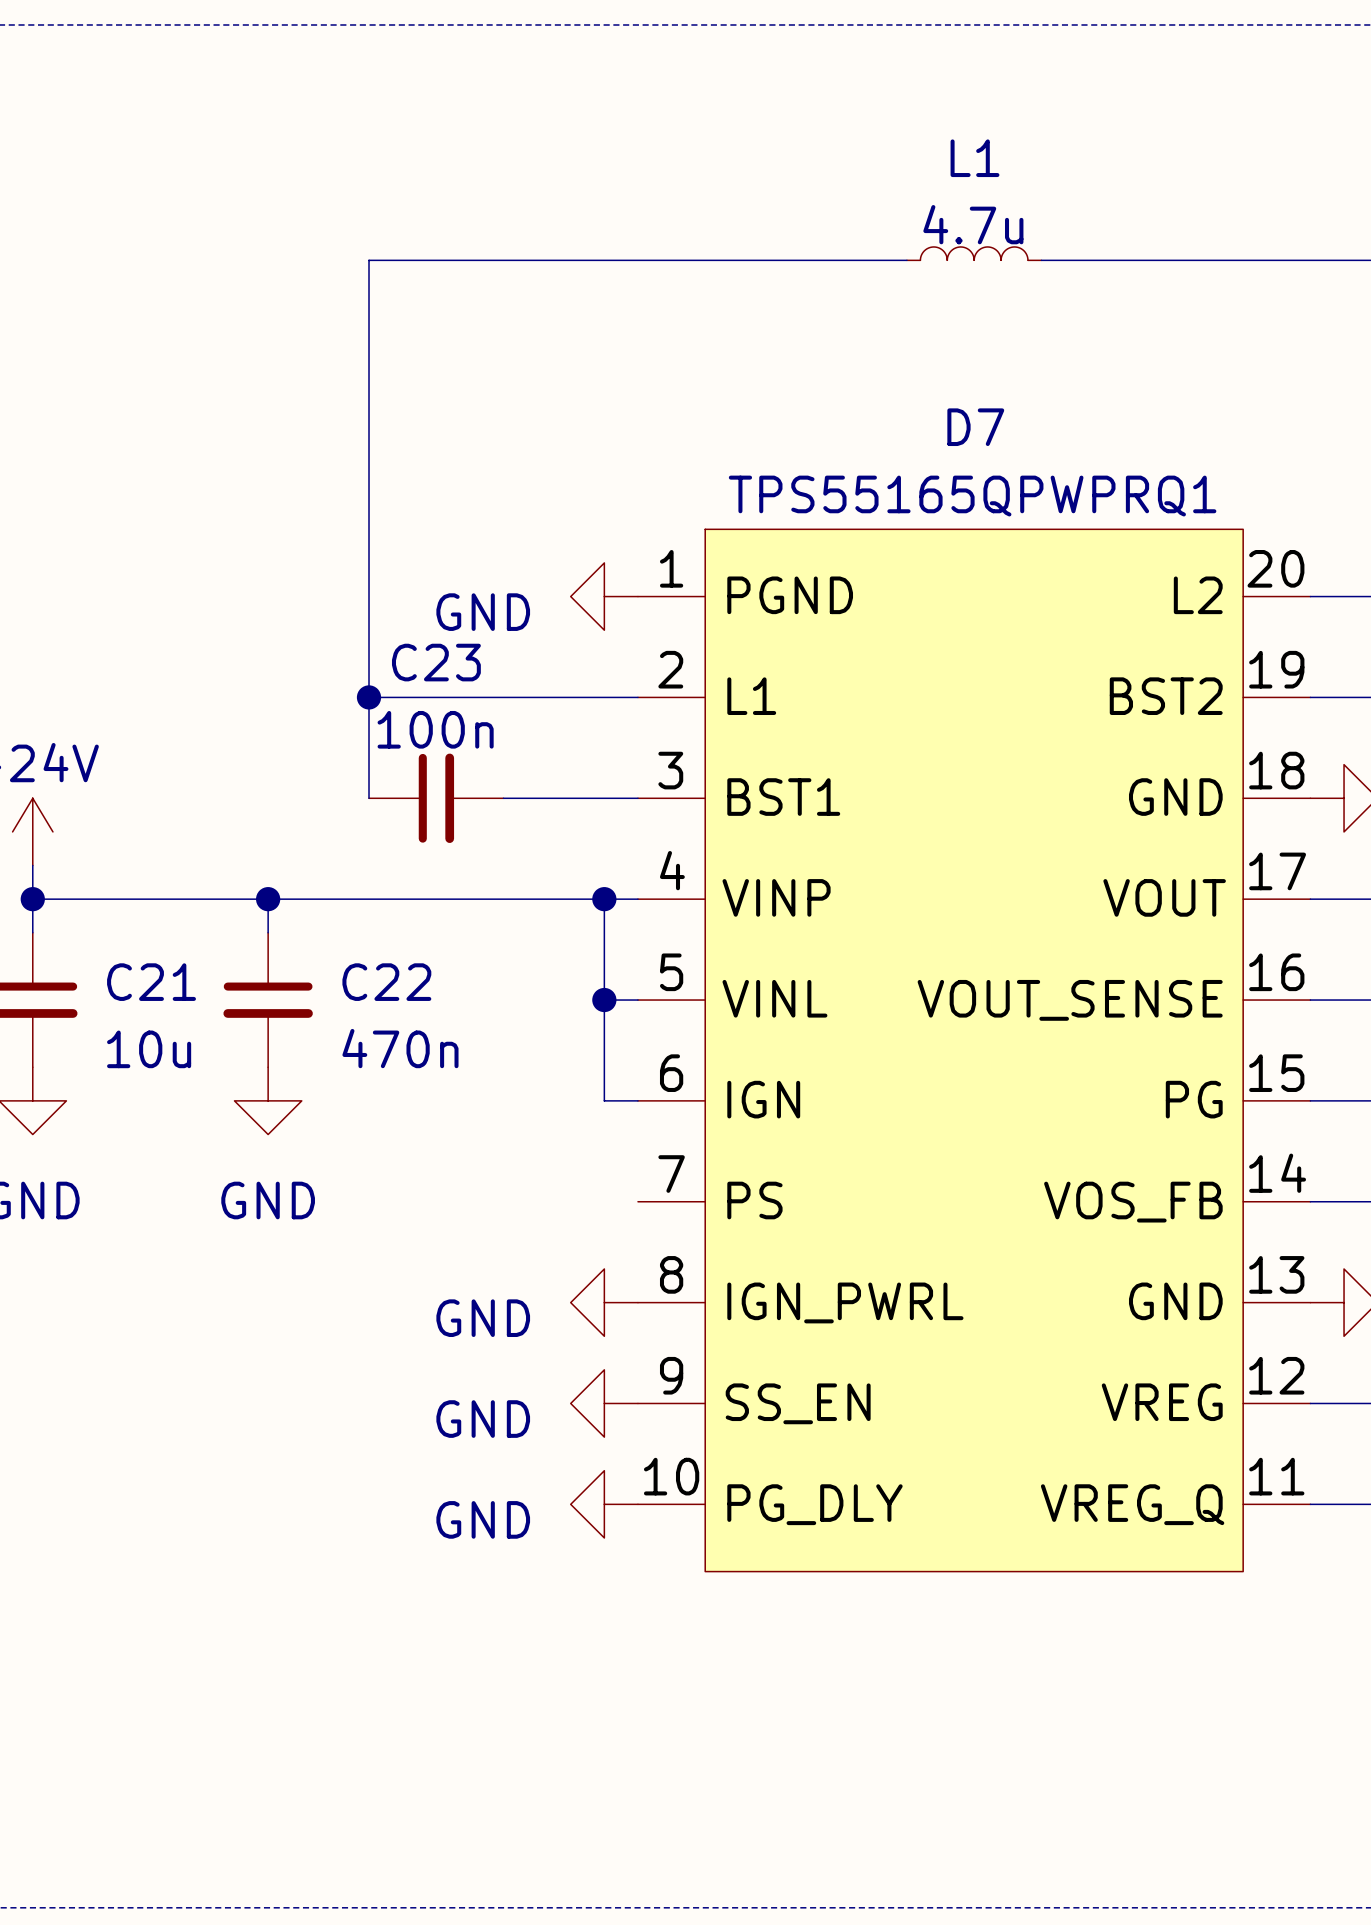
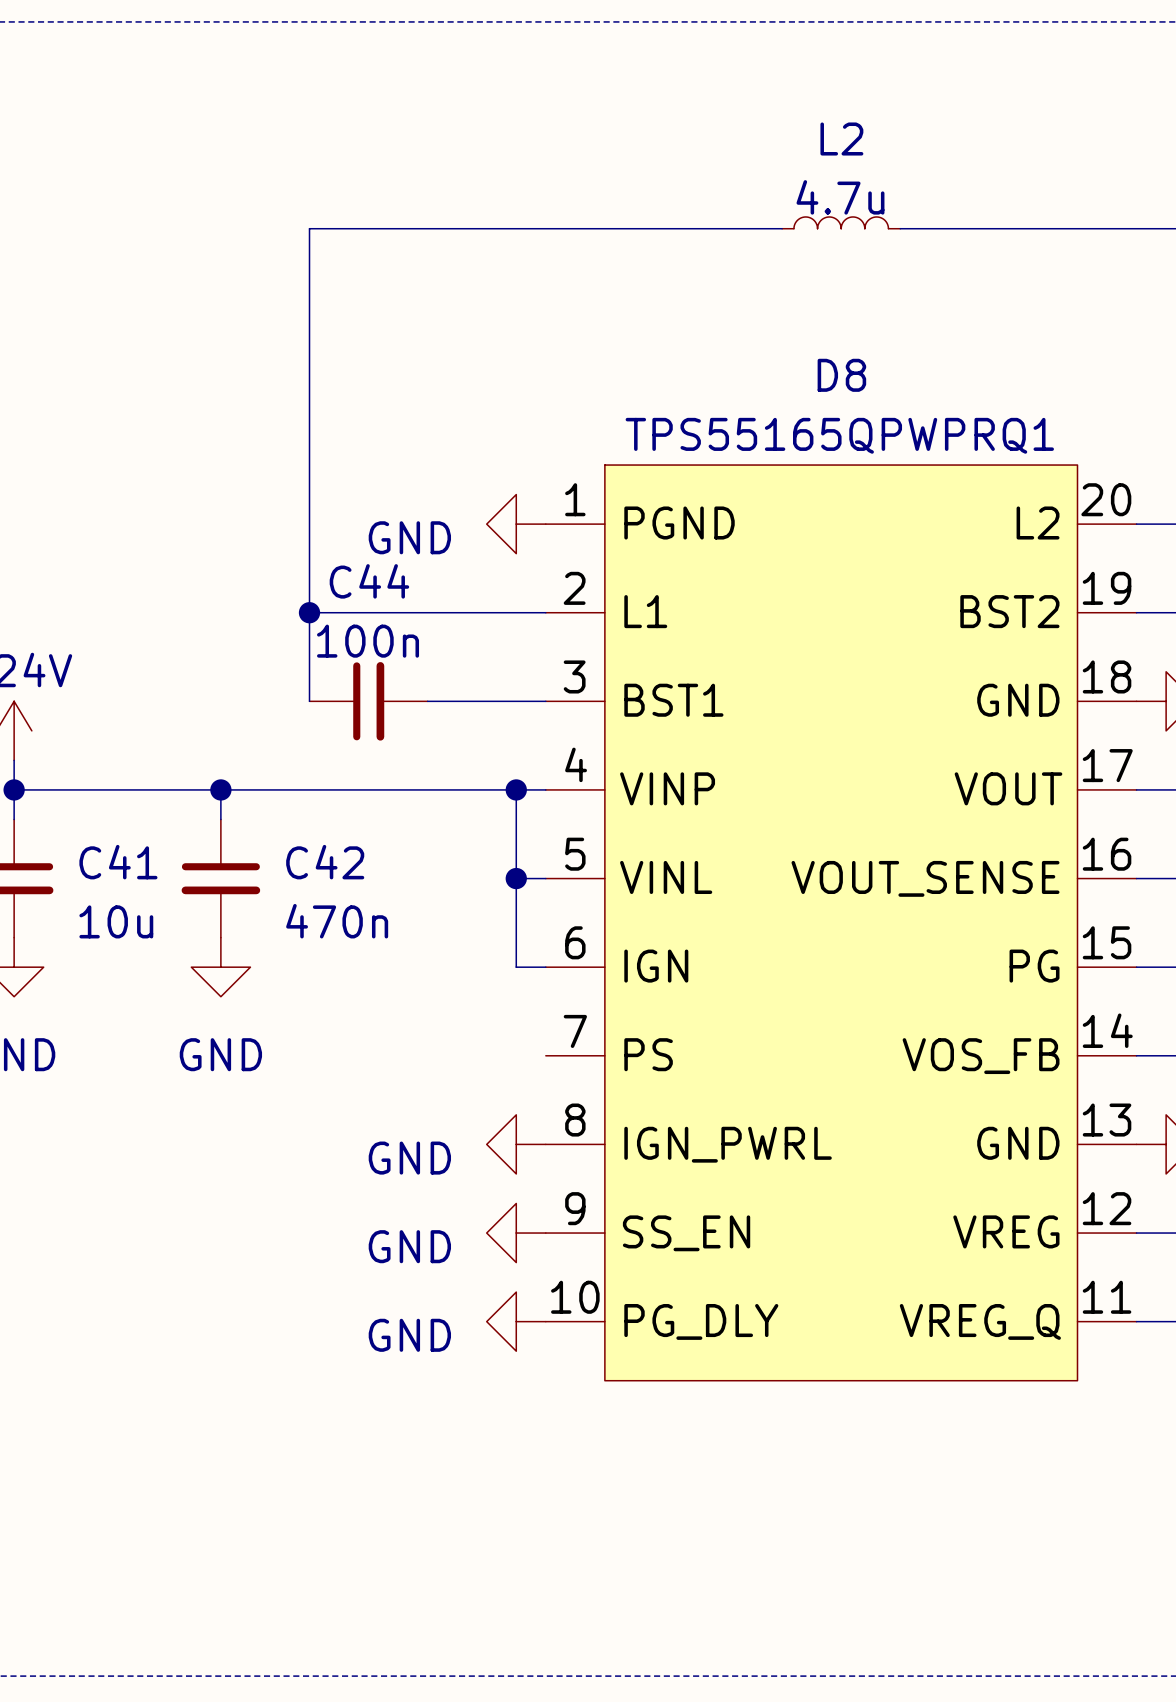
L1 name: L1 (974, 158) -> L2 (841, 139)
D7 name: D7 (975, 427) -> D8 (841, 375)
C23 name: C23 (436, 662) -> C44 (369, 581)
C21 name: C21 (151, 982) -> C41 (118, 862)
C22 name: C22 (386, 982) -> C42 (325, 862)

